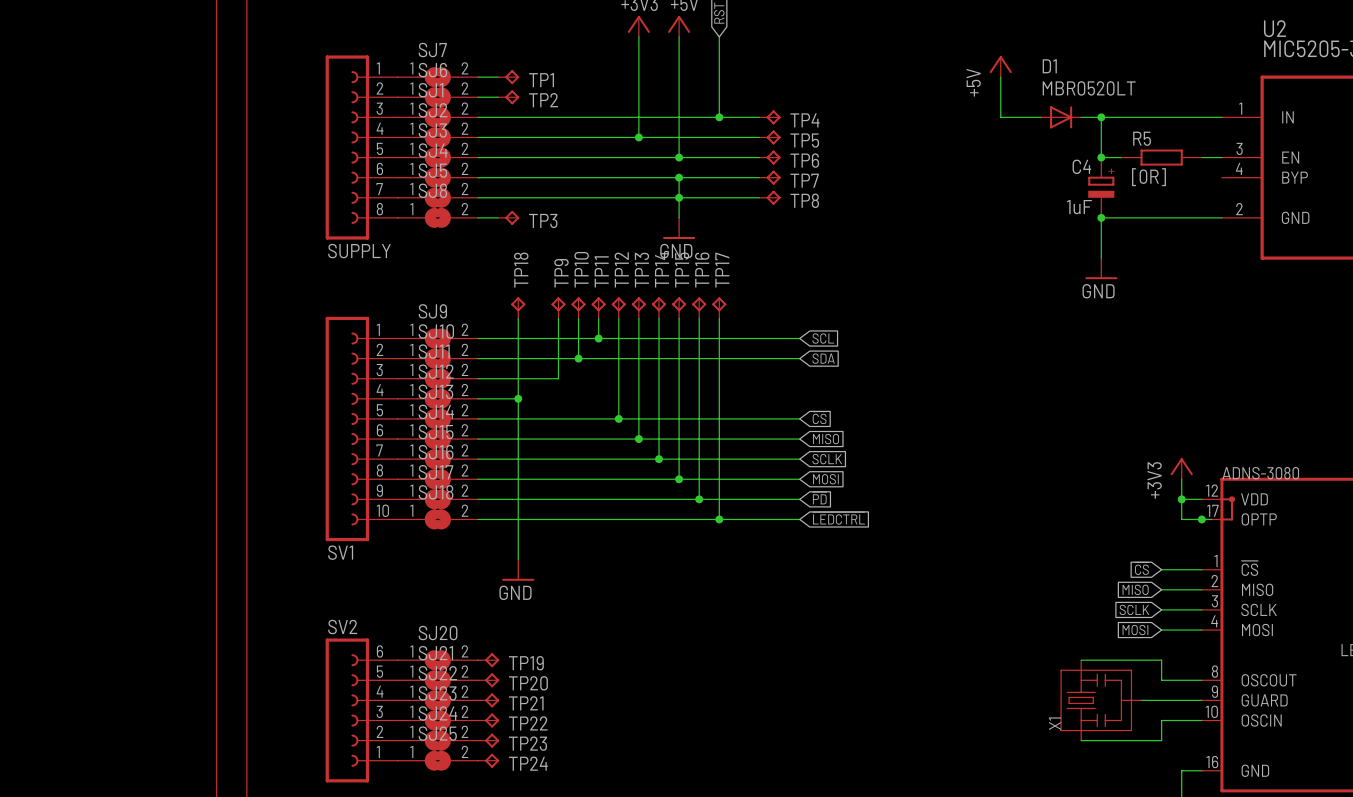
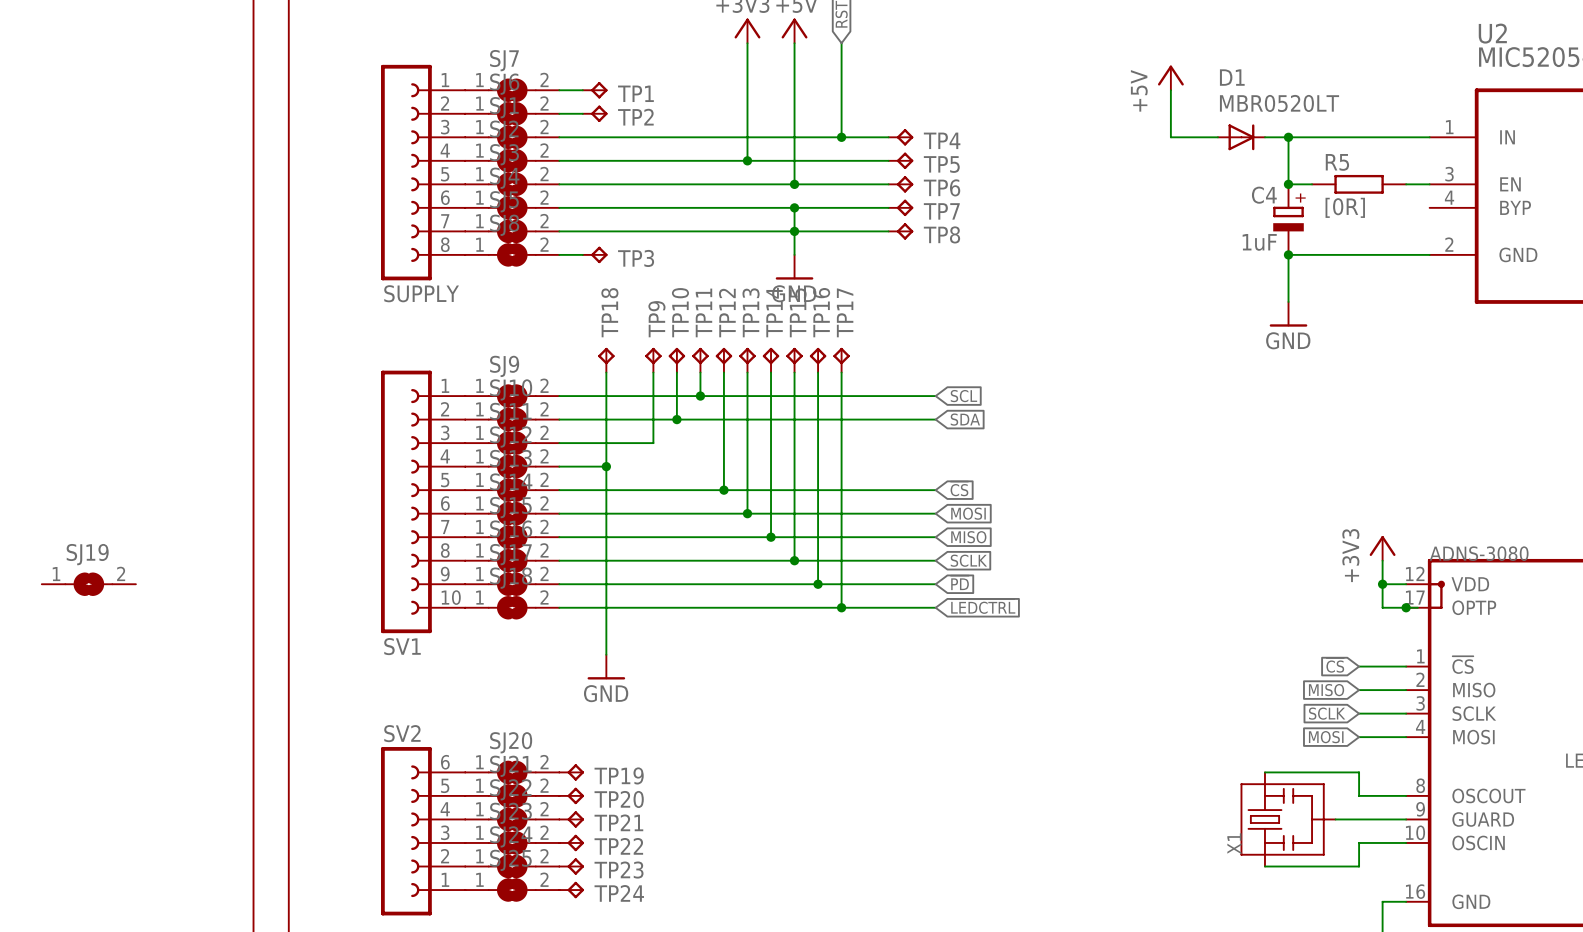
global label: MISO (826, 439) -> MOSI (968, 513)
global label: SCLK (827, 459) -> MISO (968, 537)
global label: MOSI (825, 479) -> SCLK (968, 560)
SJ19: none -> (88, 584)

